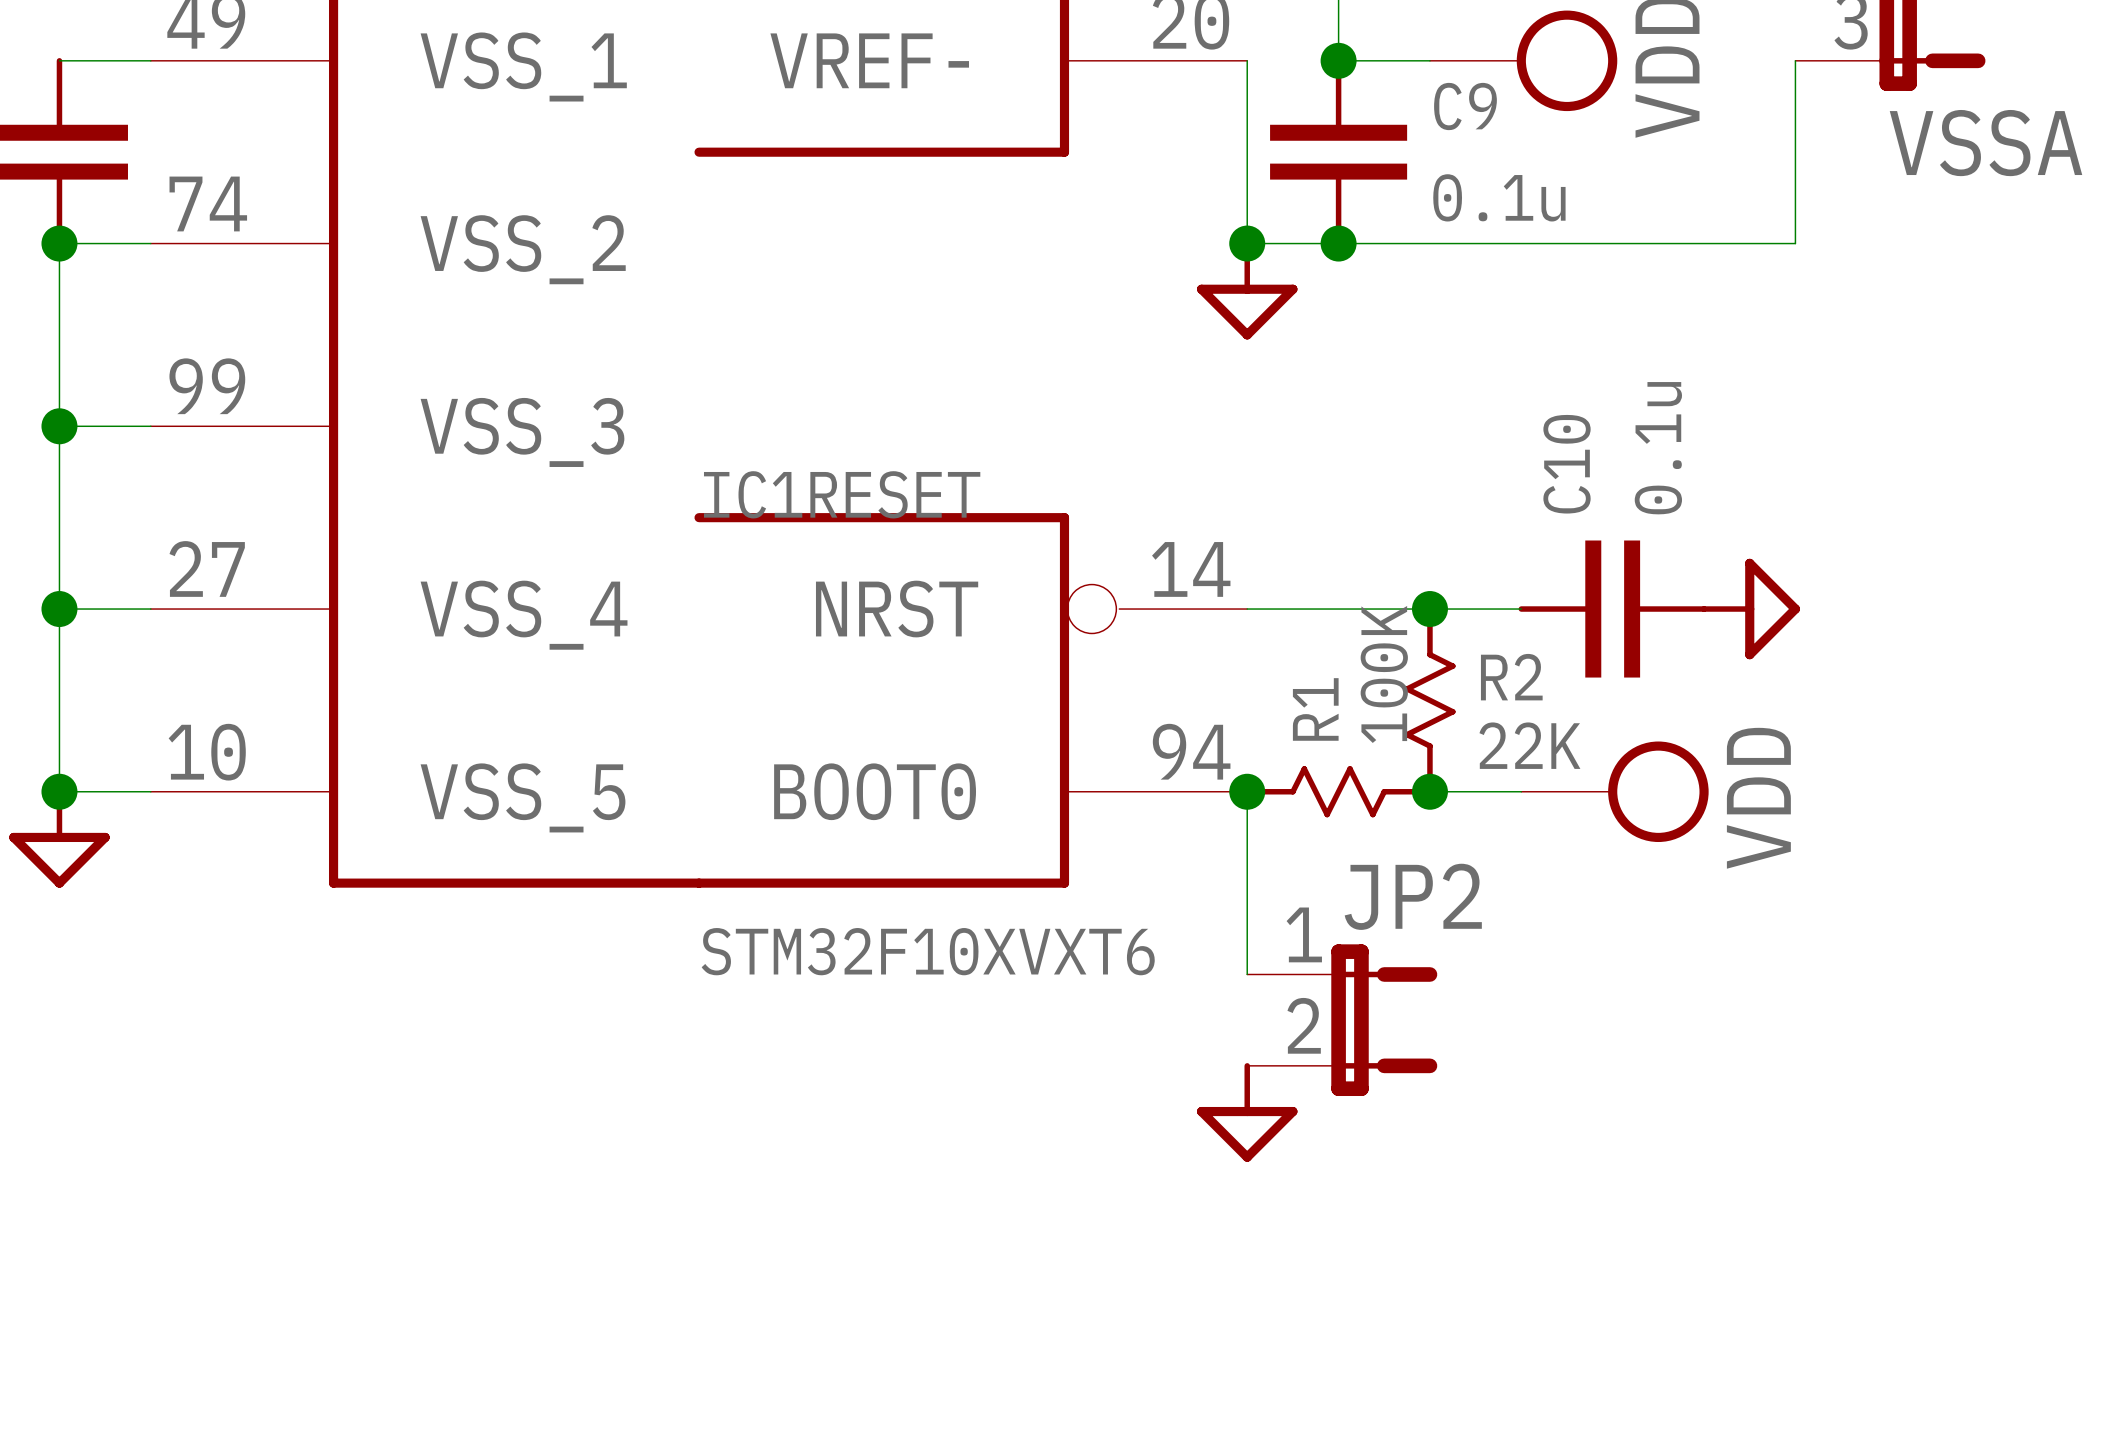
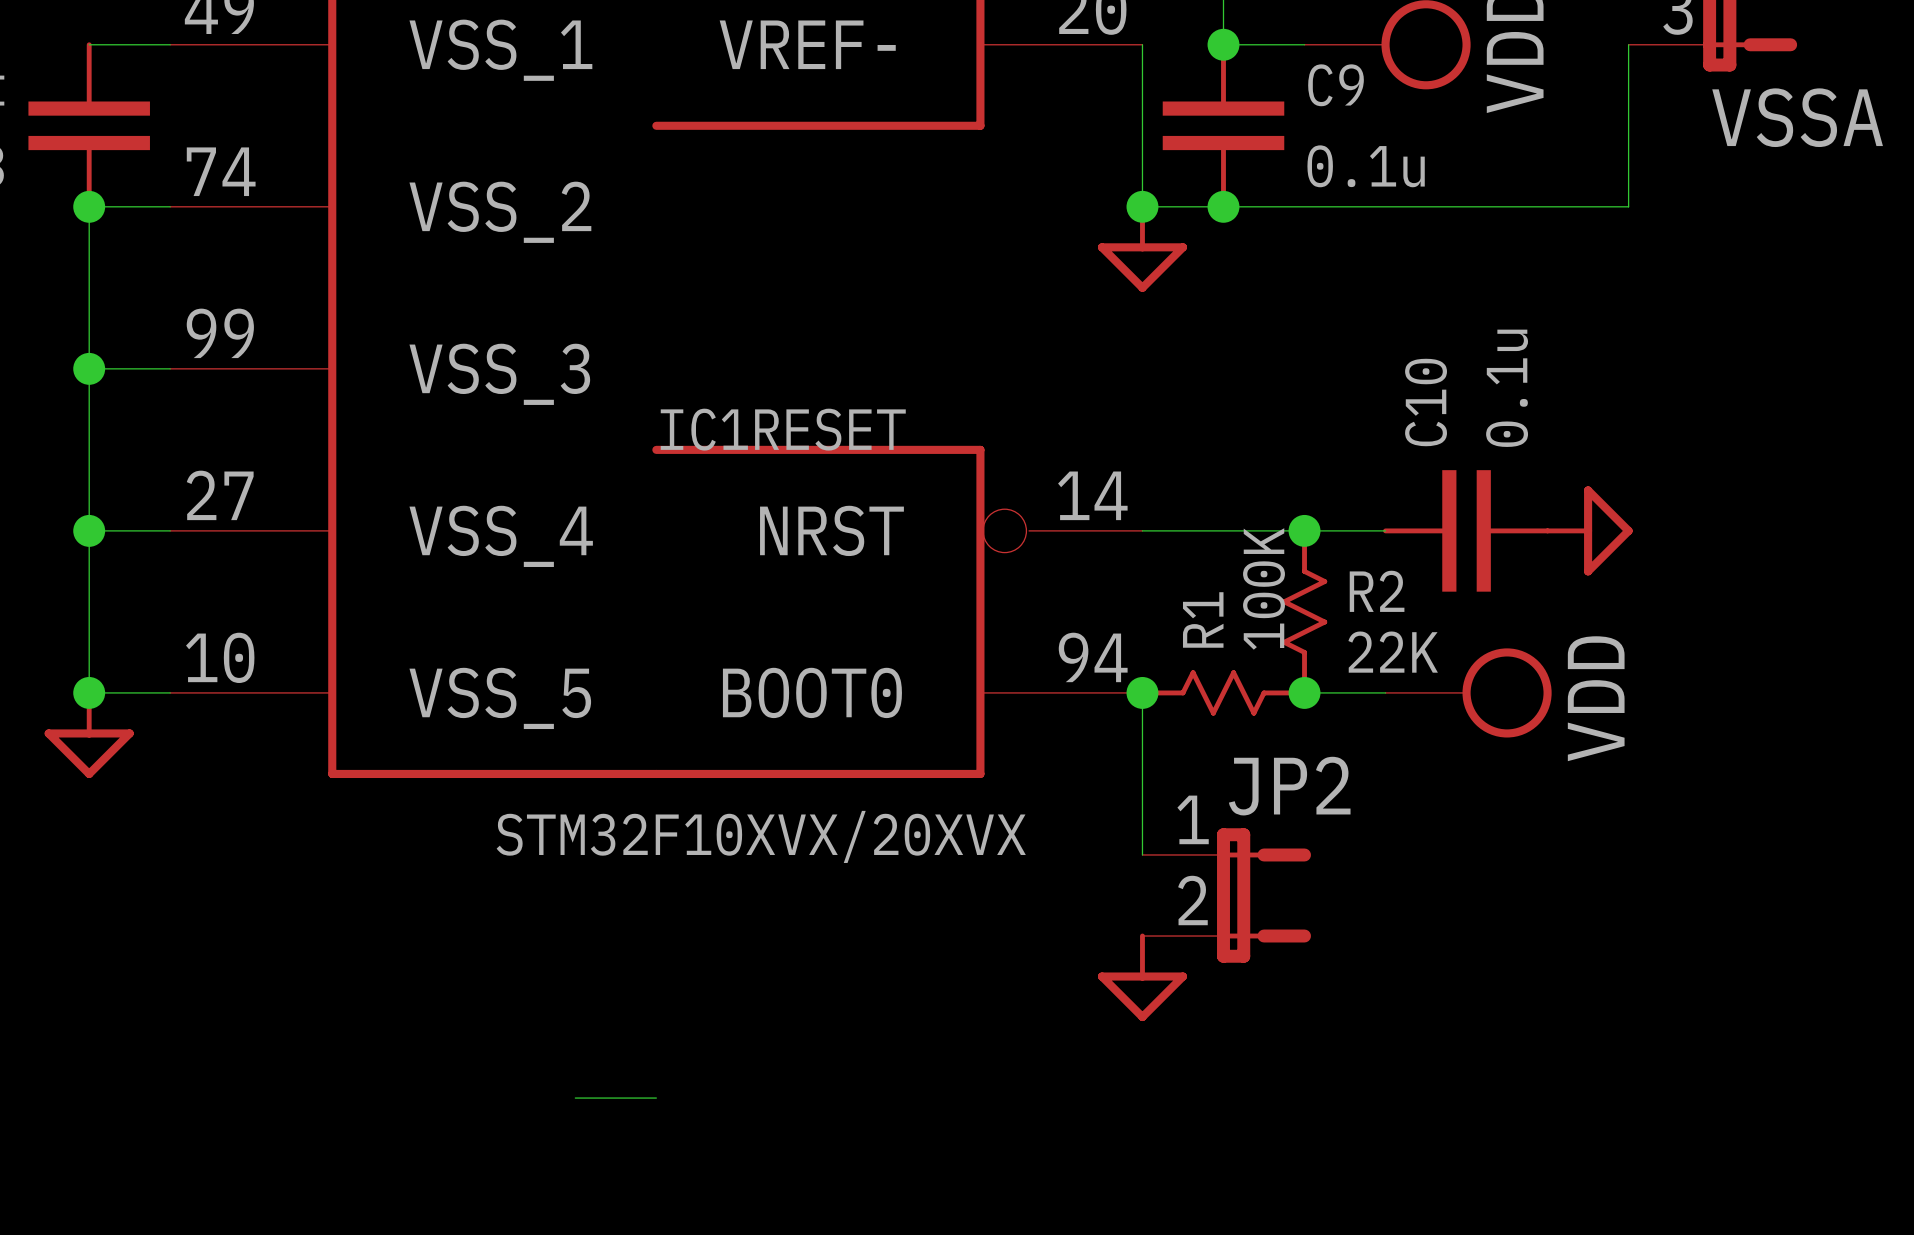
IC1RESET value: STM32F10XVXT6 (928, 951) -> STM32F10XVX/20XVX (761, 836)
wire: none -> (575, 1098) (656, 1098)

